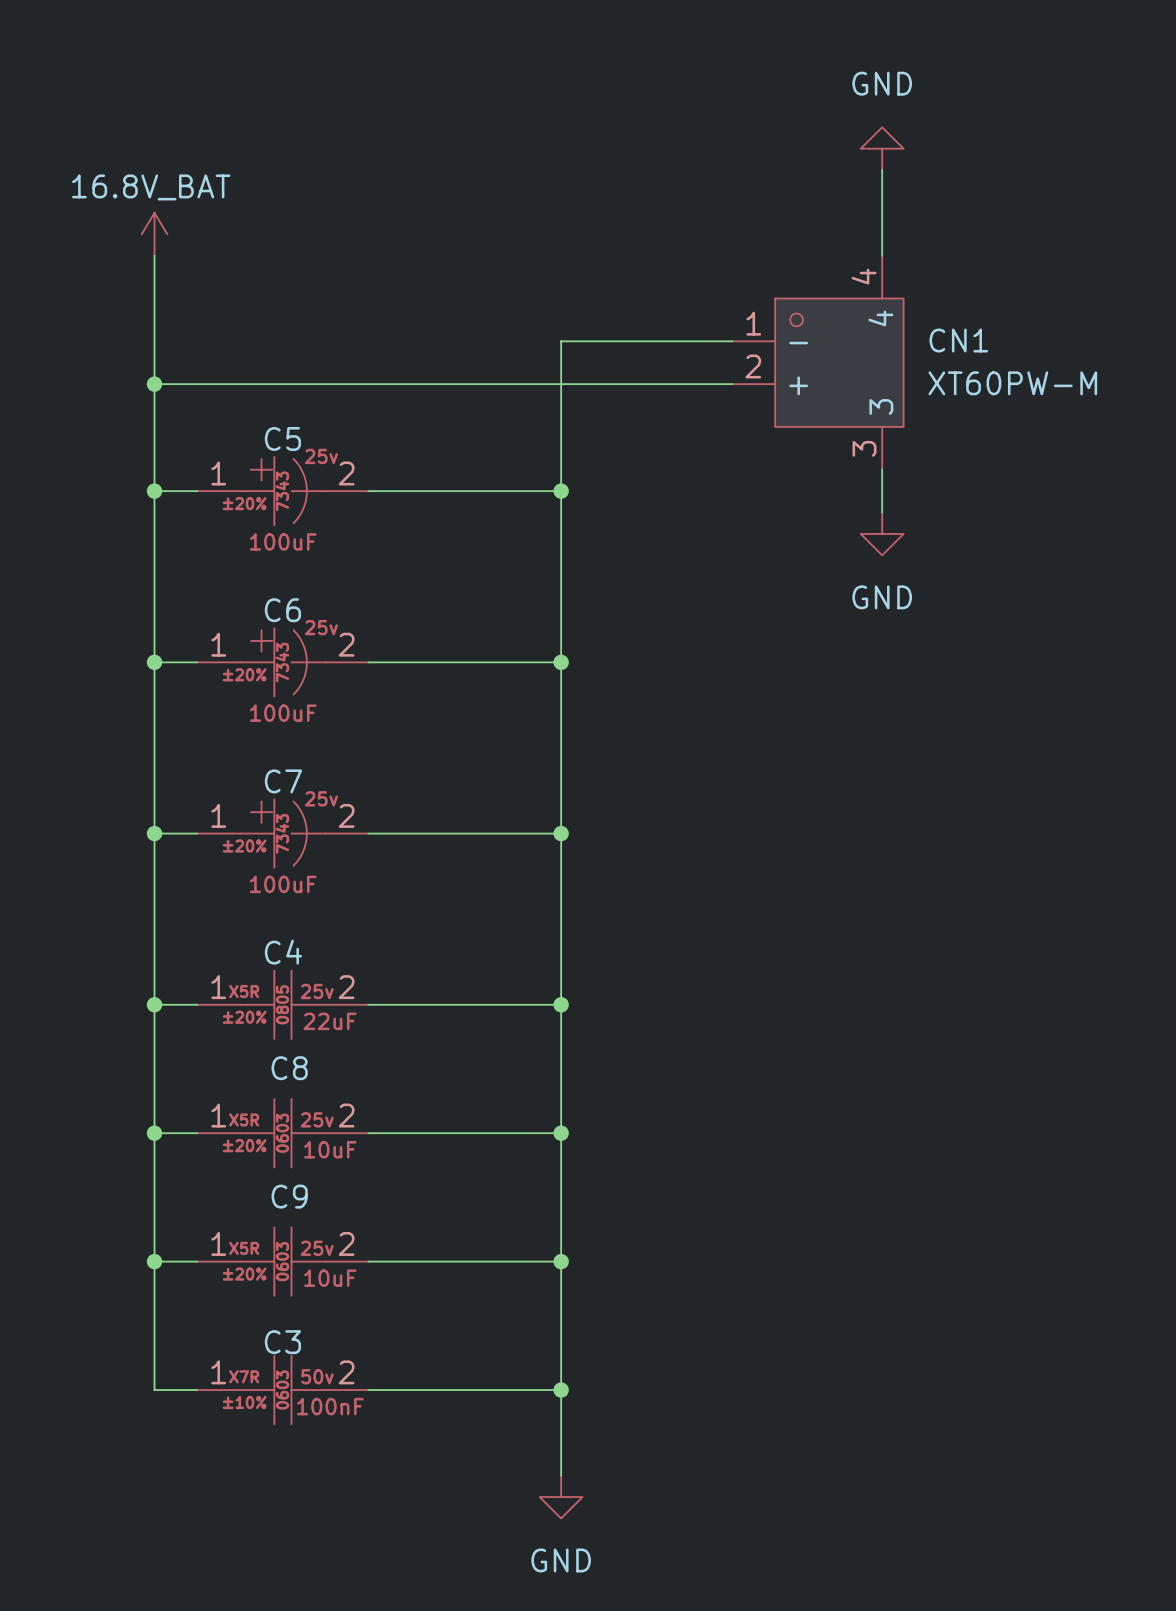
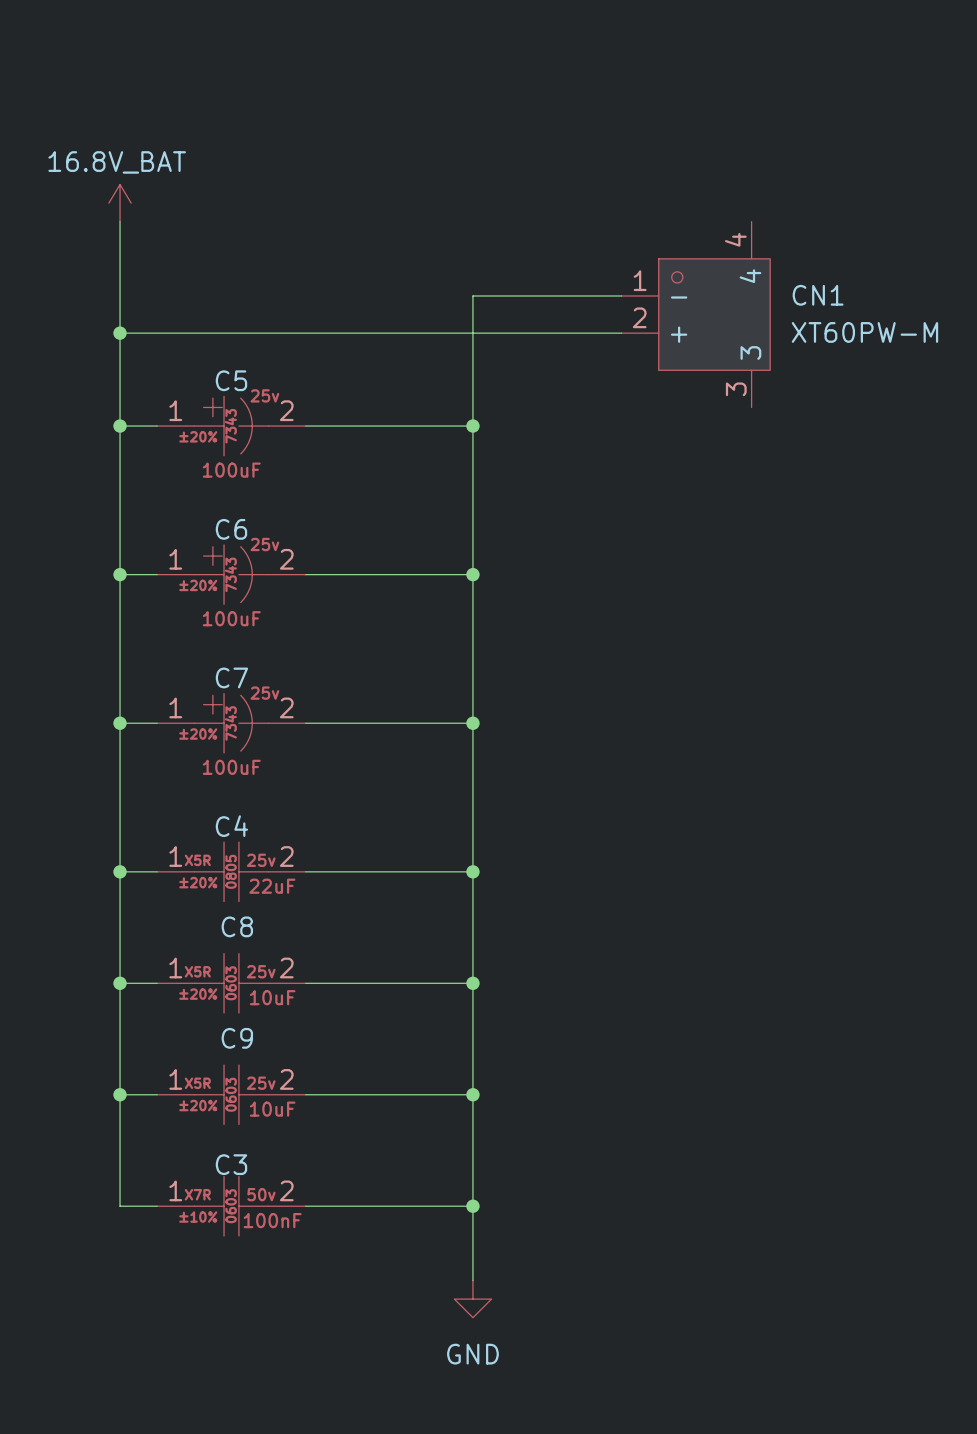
power symbol: GND (882, 148) -> none
wire: (882, 170) (882, 255) -> none
wire: (882, 469) (882, 512) -> none
power symbol: GND (882, 533) -> none

